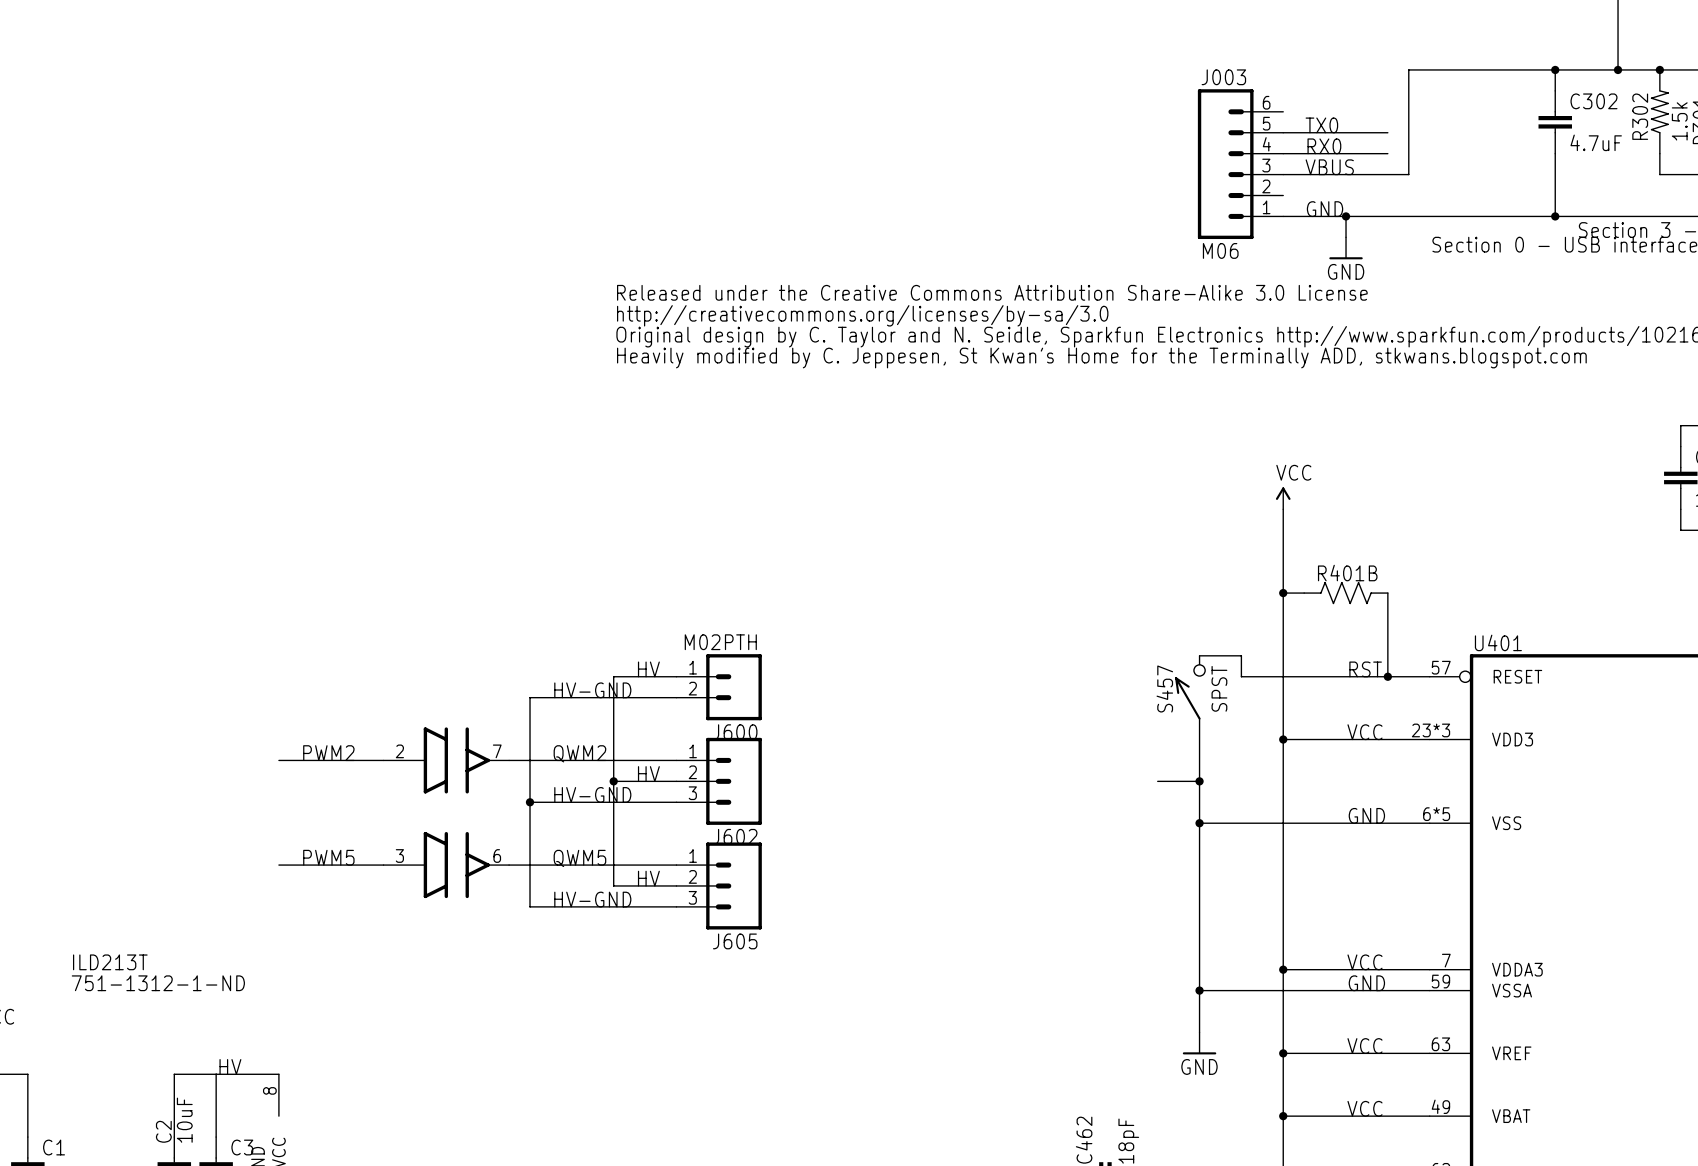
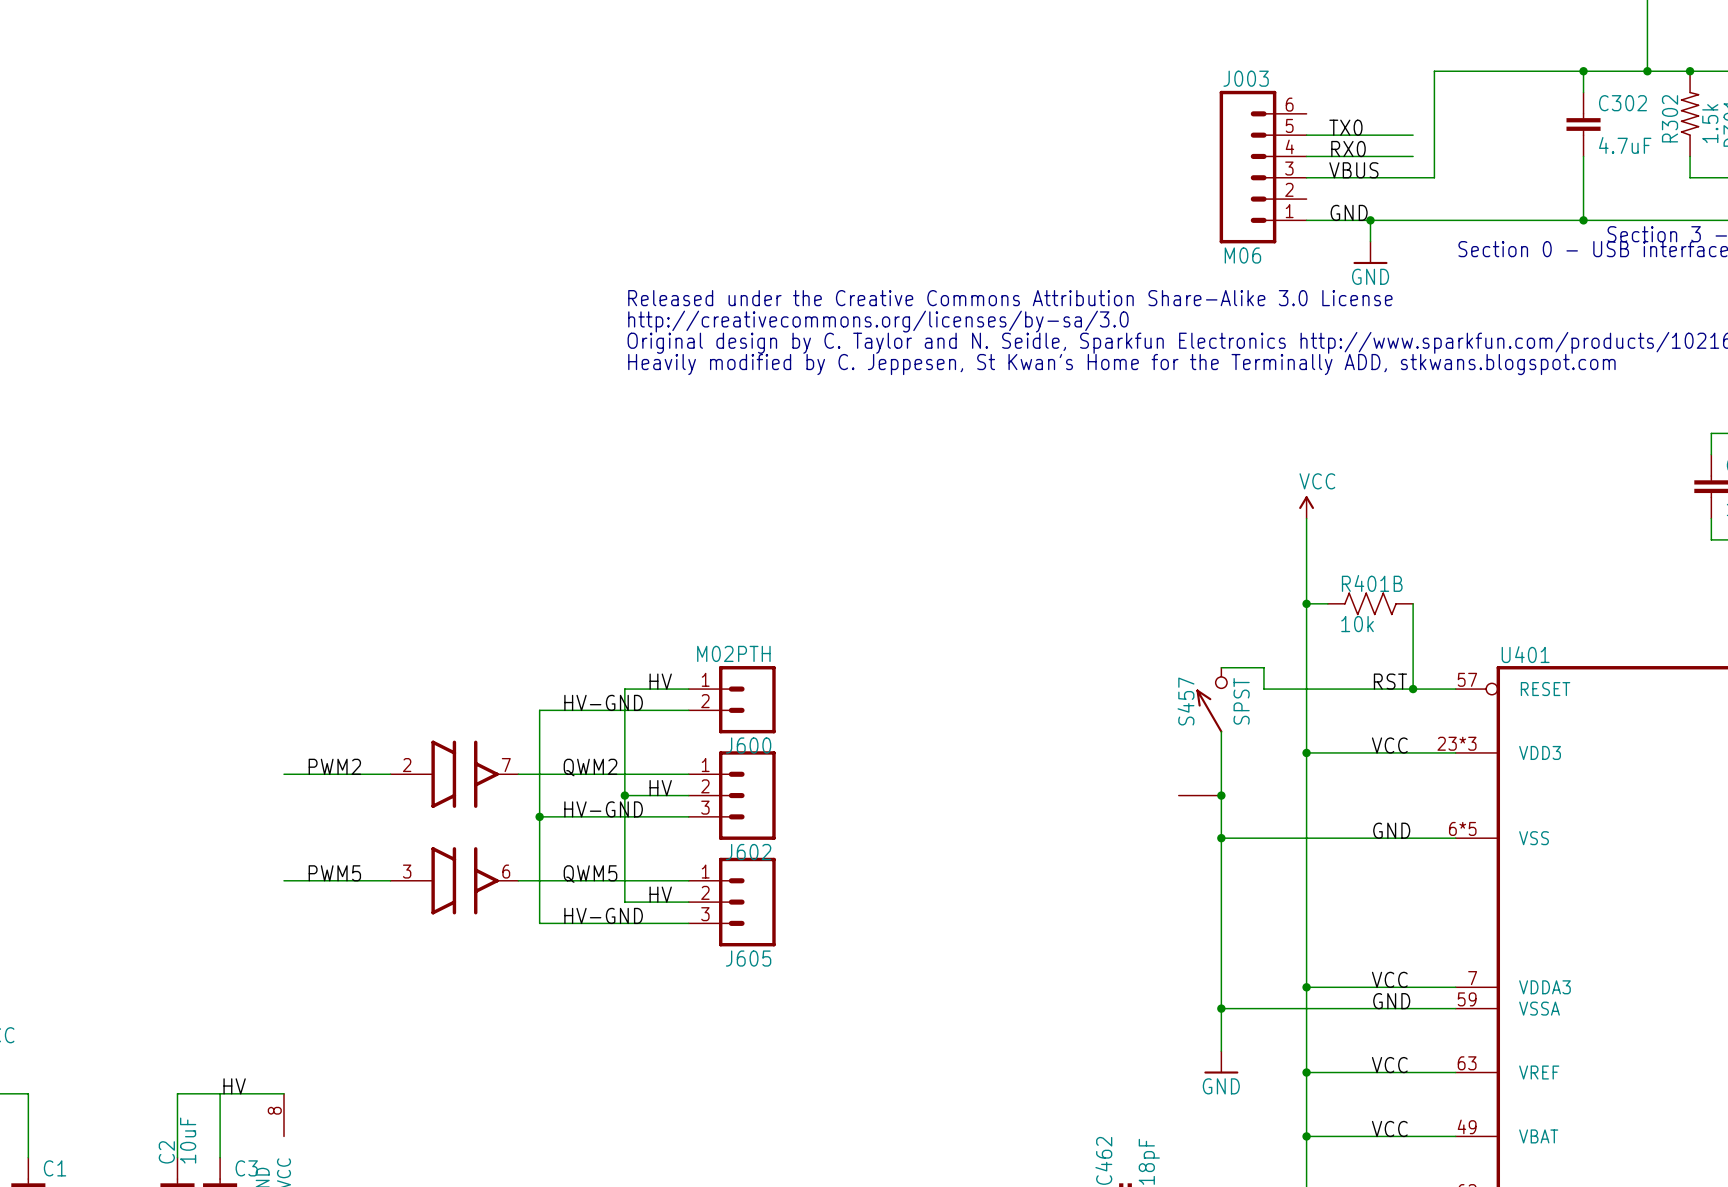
R401B value: none -> 10k (1357, 624)
text: ILD213T (110, 962) -> none
text: 751-1312-1-ND (158, 983) -> none

